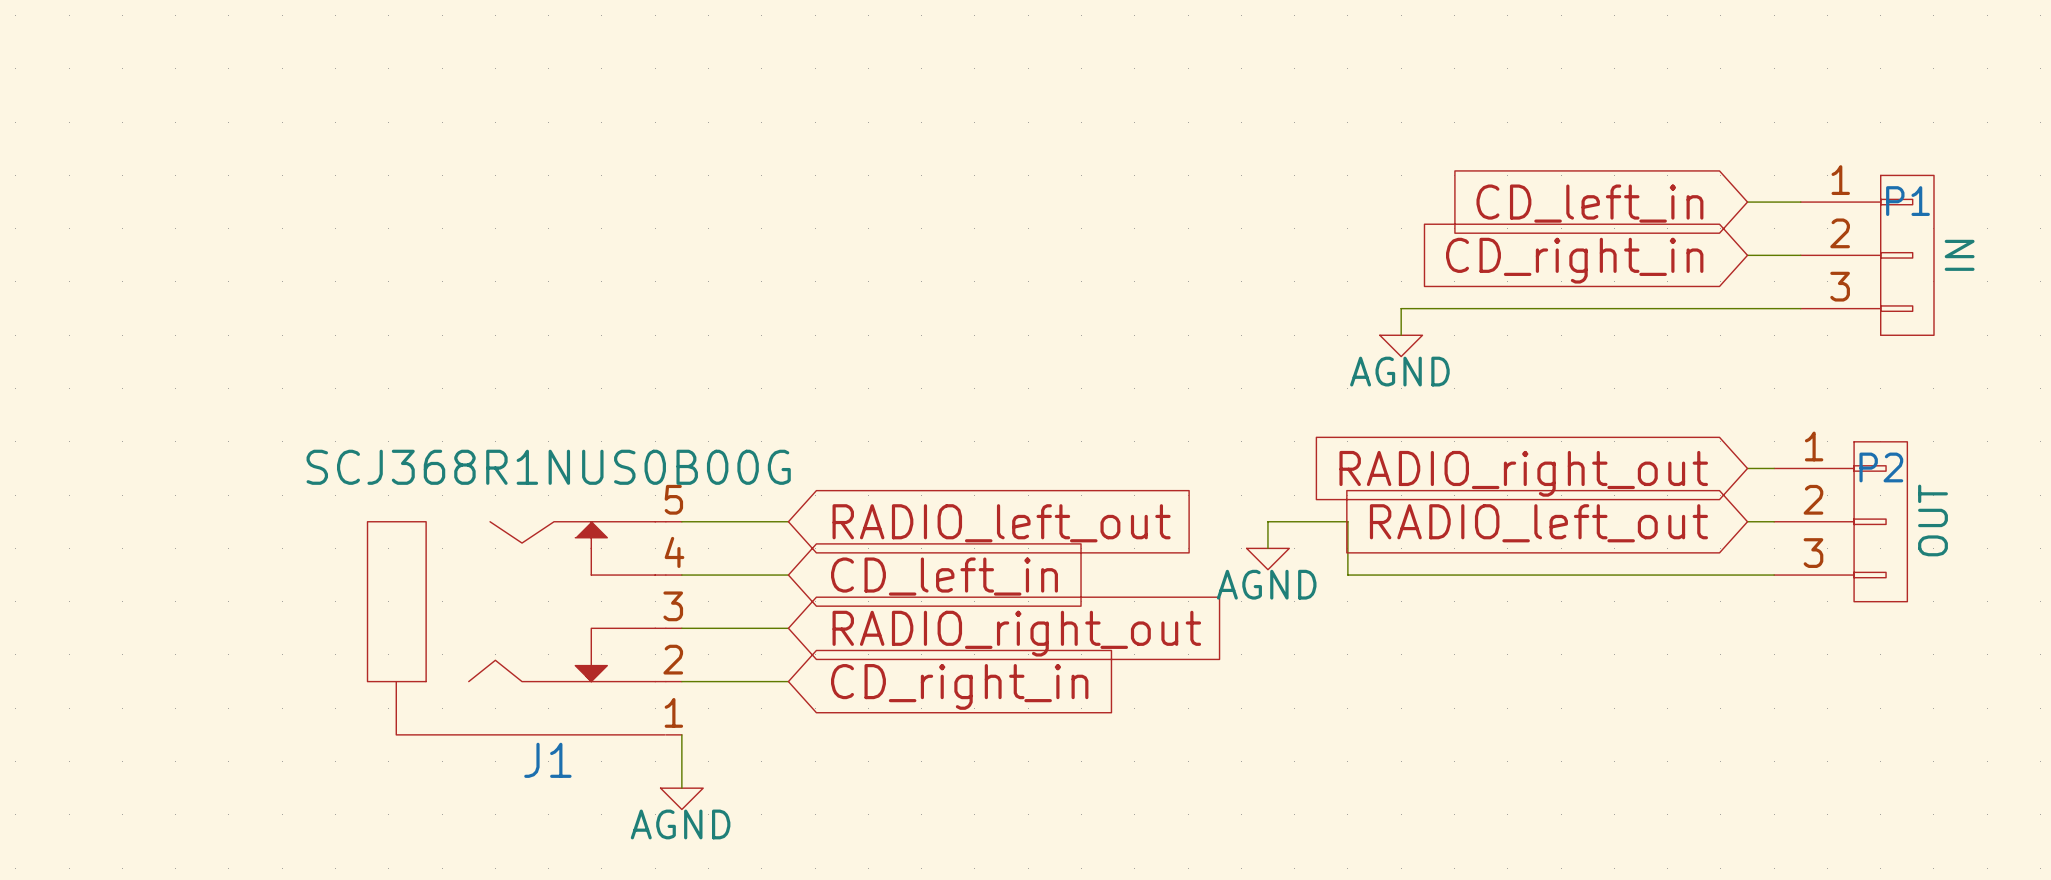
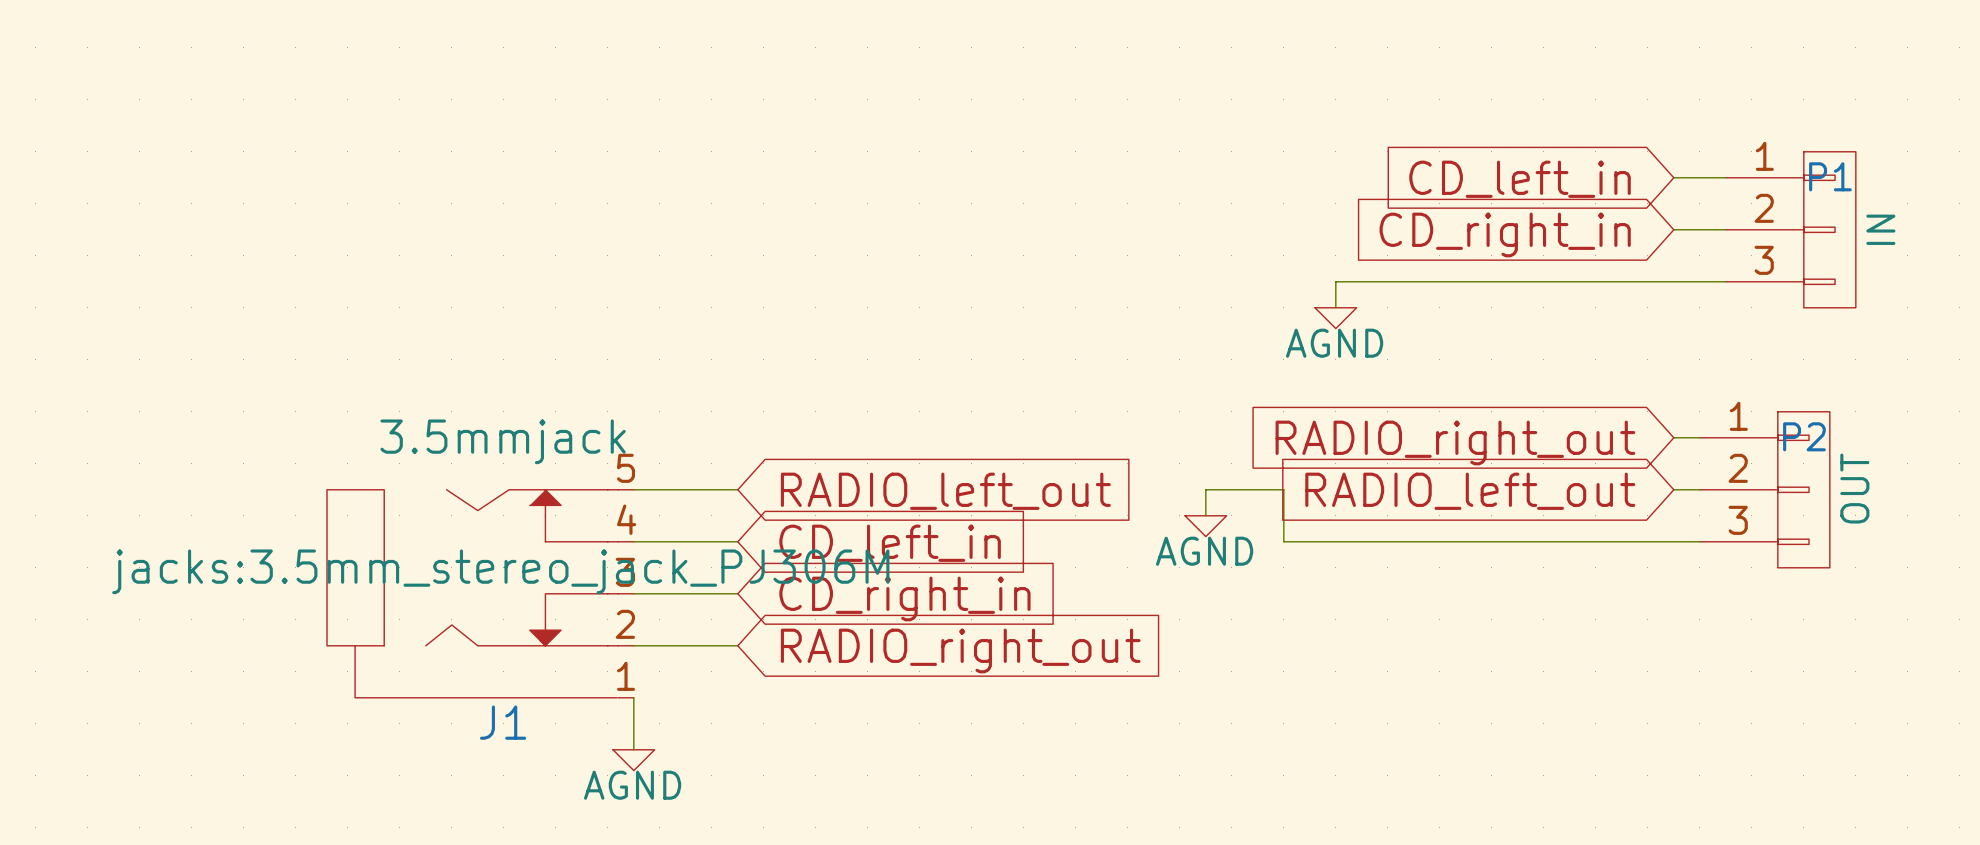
J1 value: SCJ368R1NUS0B00G (548, 467) -> 3.5mmjack (503, 441)
J1 text: none -> jacks:3.5mm_stereo_jack_PJ306M (500, 571)
global label: RADIO_right_out (1016, 633) -> CD_right_in (904, 598)
global label: CD_right_in (959, 686) -> RADIO_right_out (960, 650)

